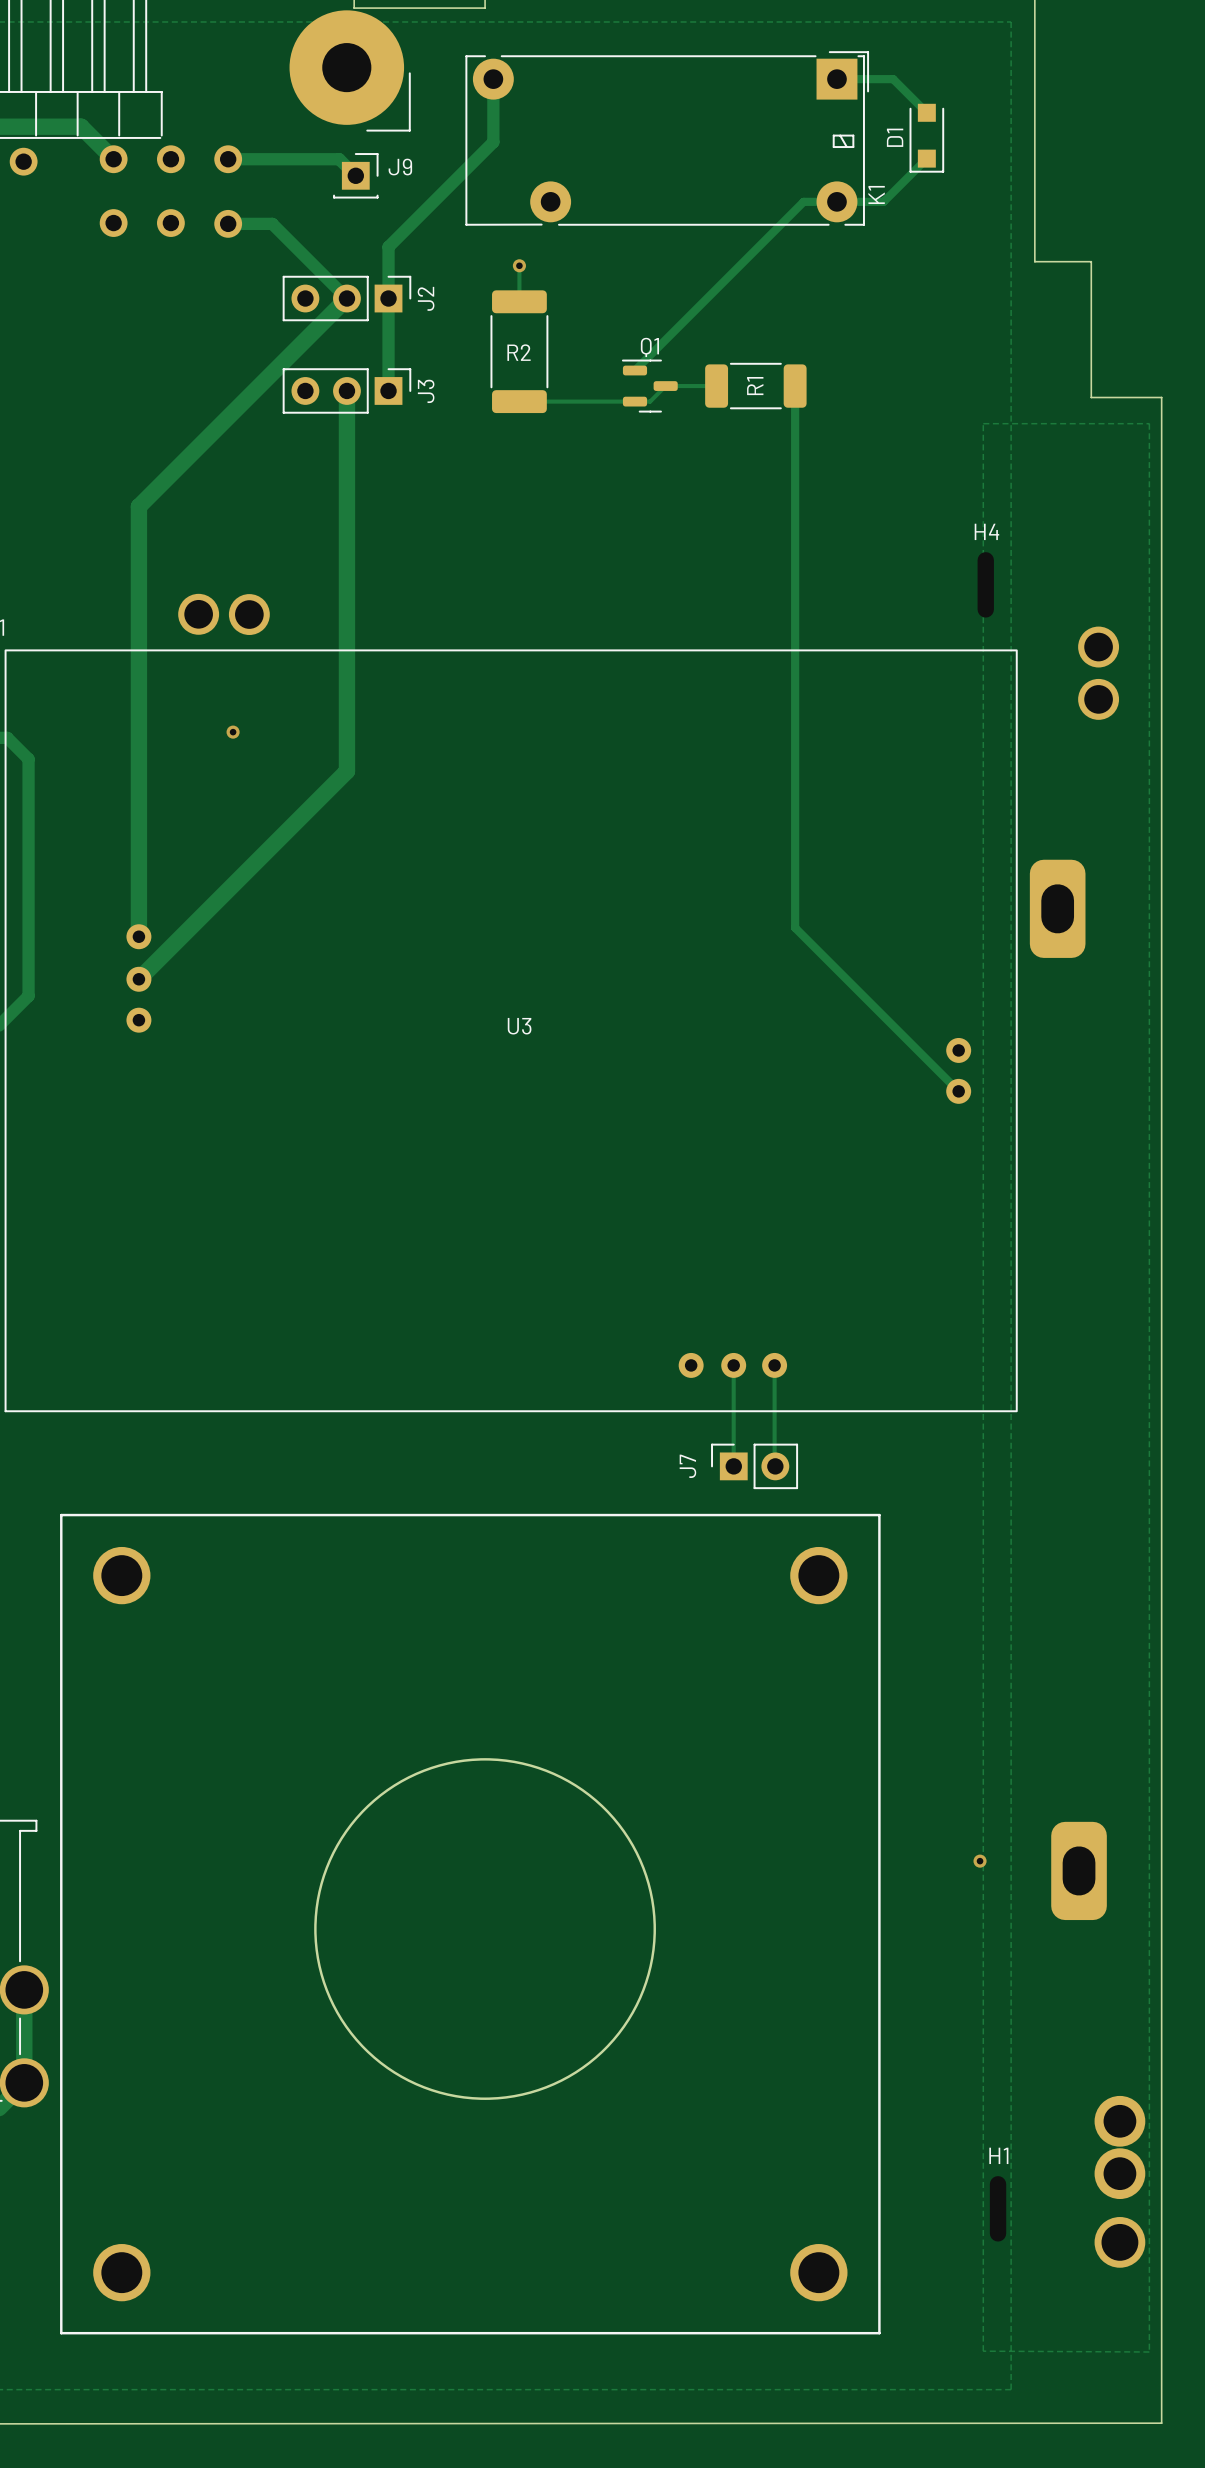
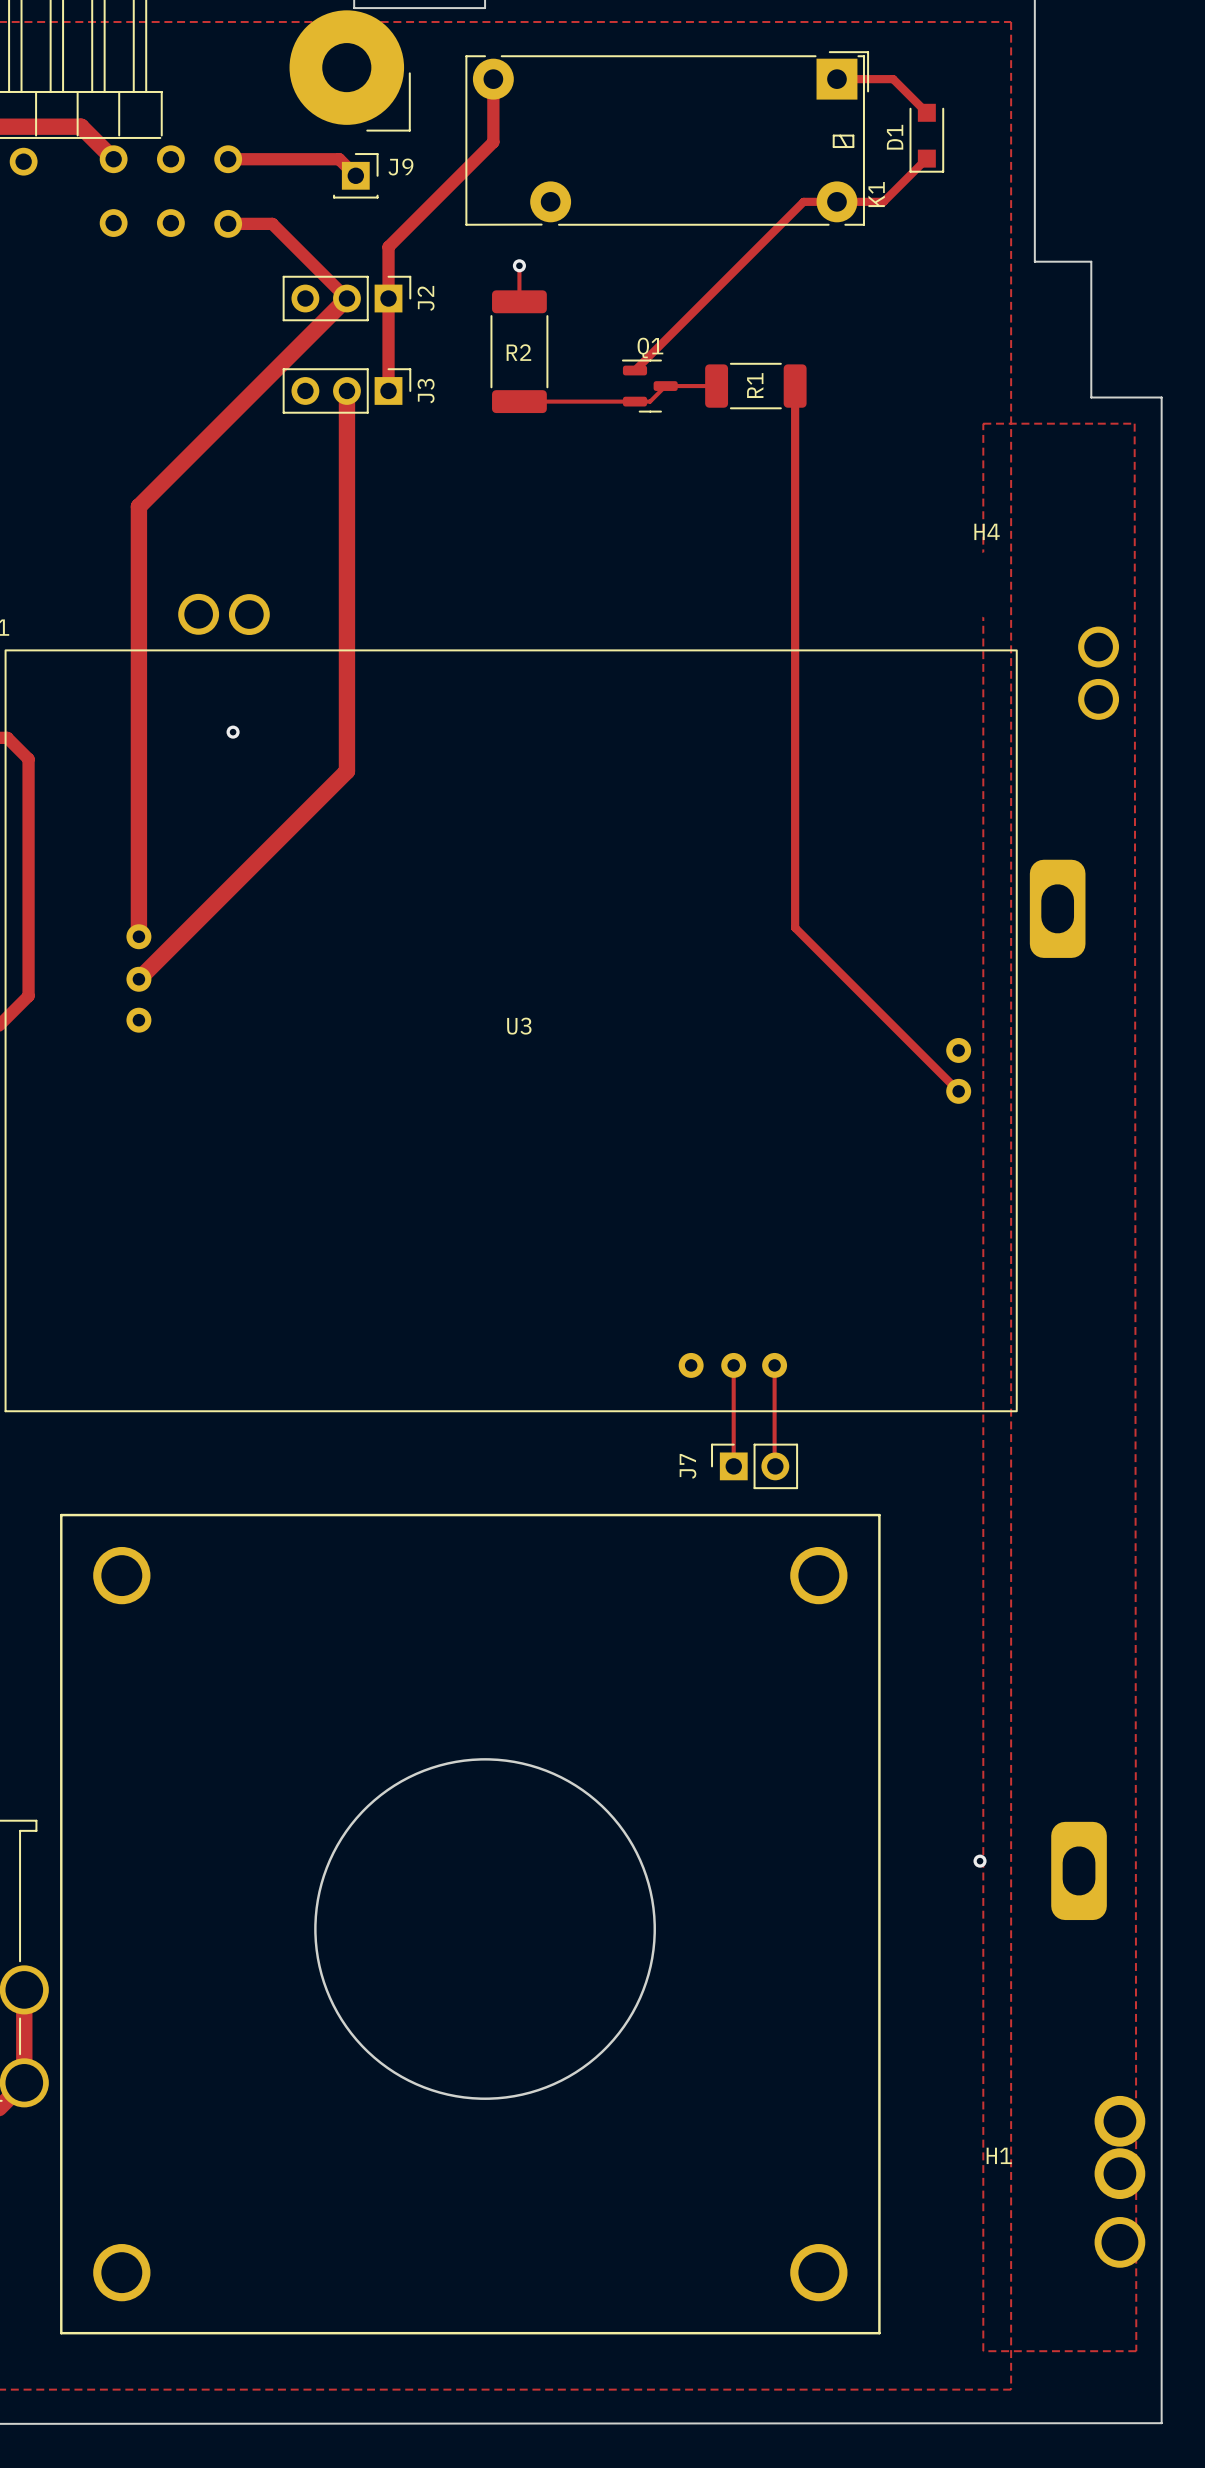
zone outline: (1134, 423) (1149, 423) (1149, 2352) (983, 2351) -> (1134, 423) (1136, 2351) (983, 2351)

